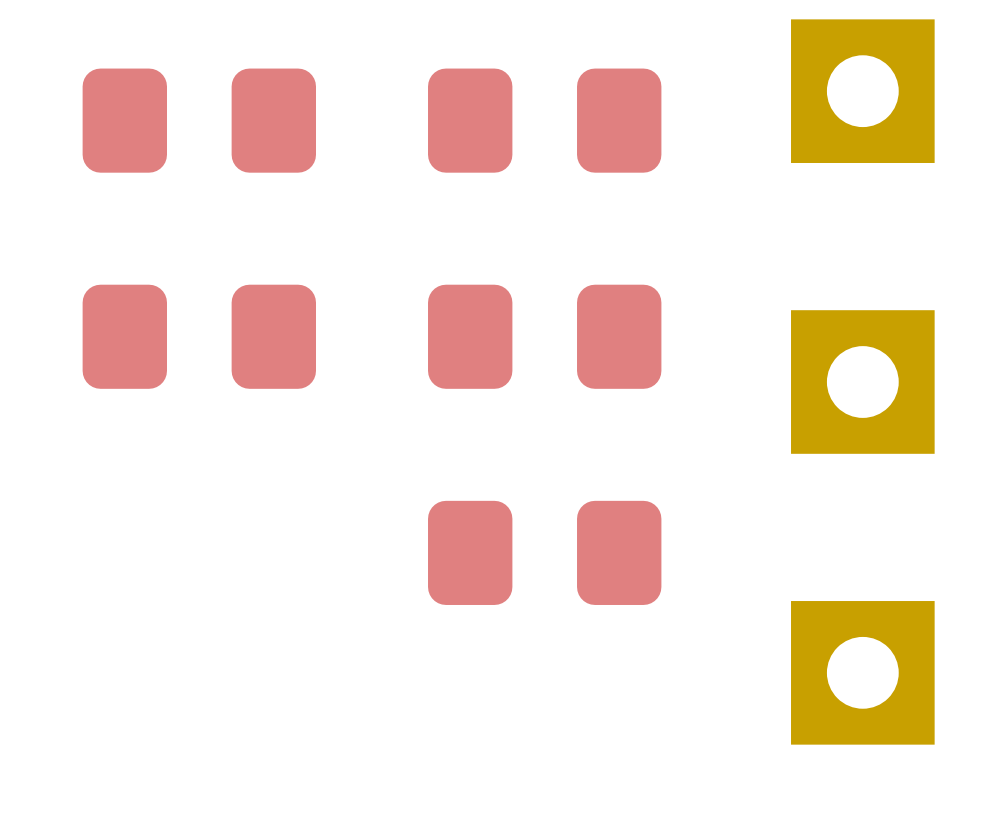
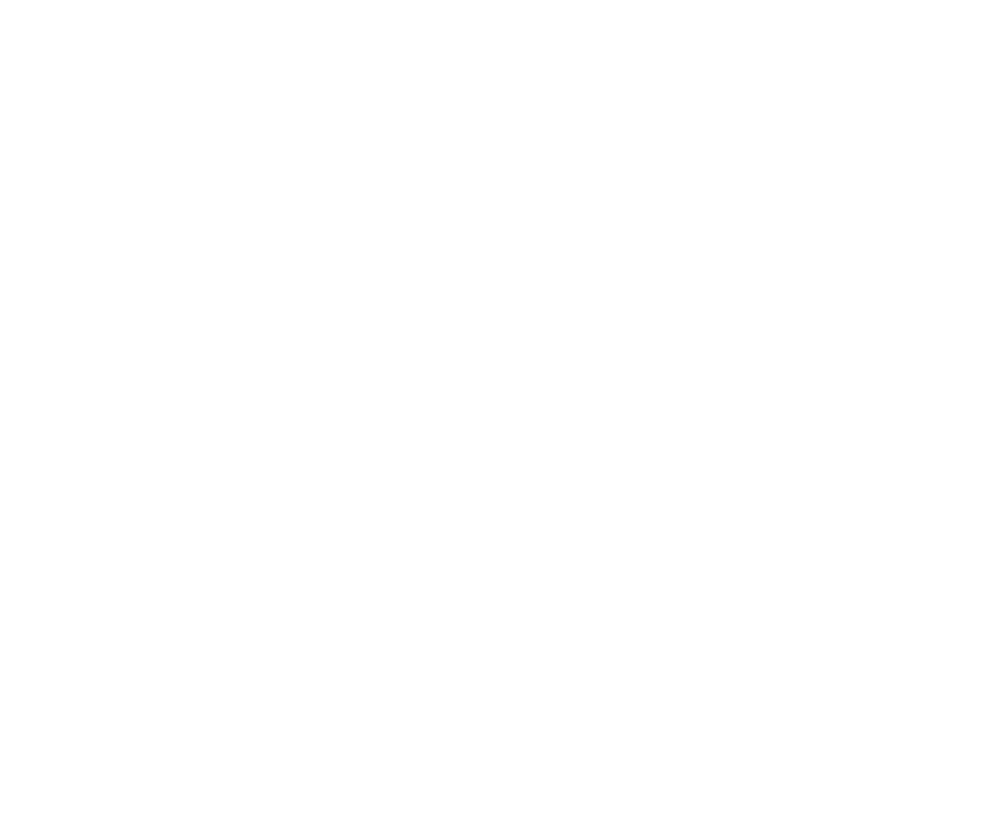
part: (862, 91) -> none
part: (199, 120) -> none
part: (544, 120) -> none
part: (199, 336) -> none
part: (544, 336) -> none
part: (862, 382) -> none
part: (544, 552) -> none
part: (862, 672) -> none

